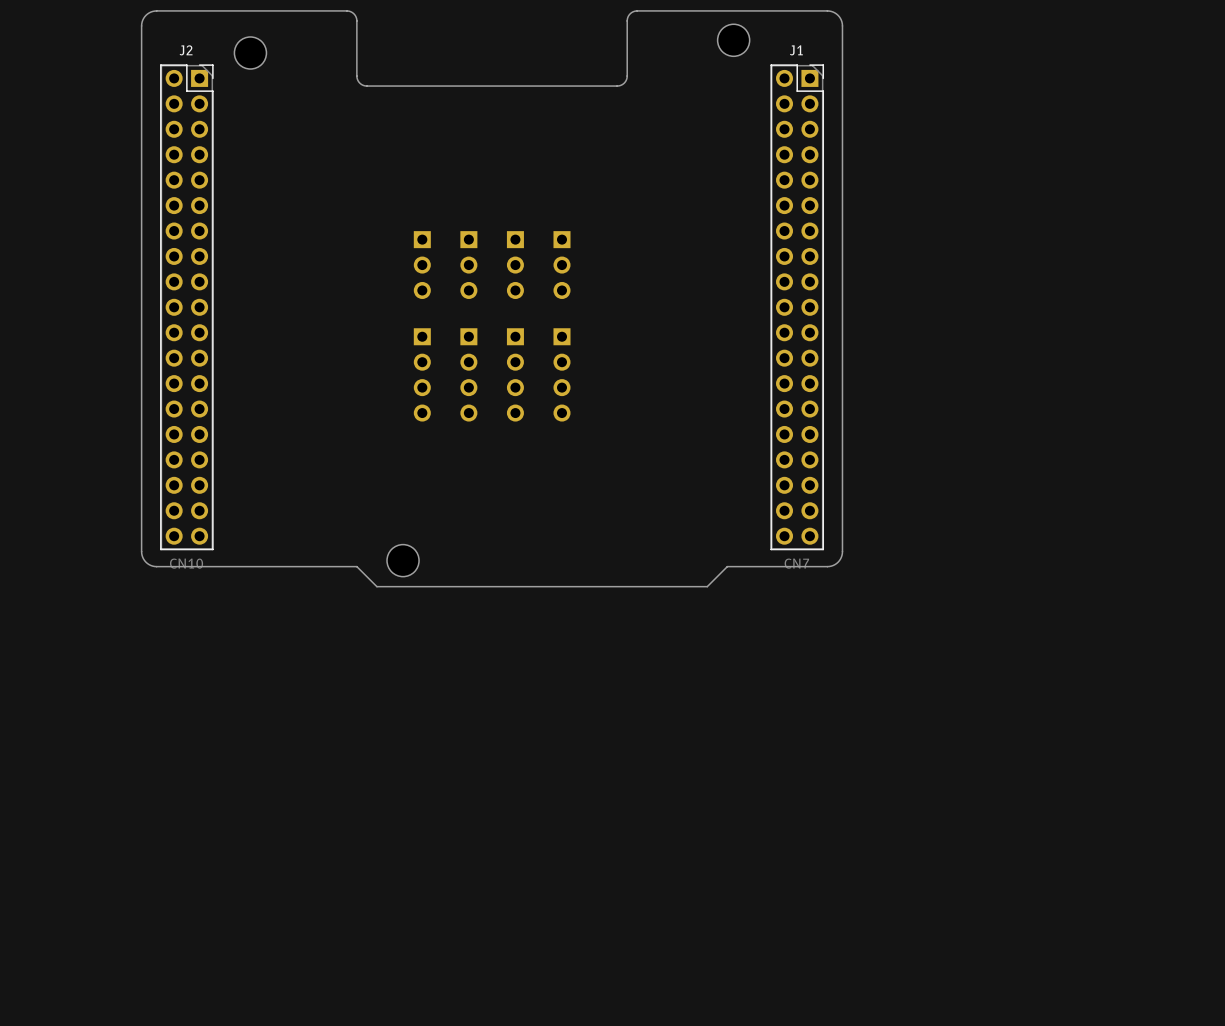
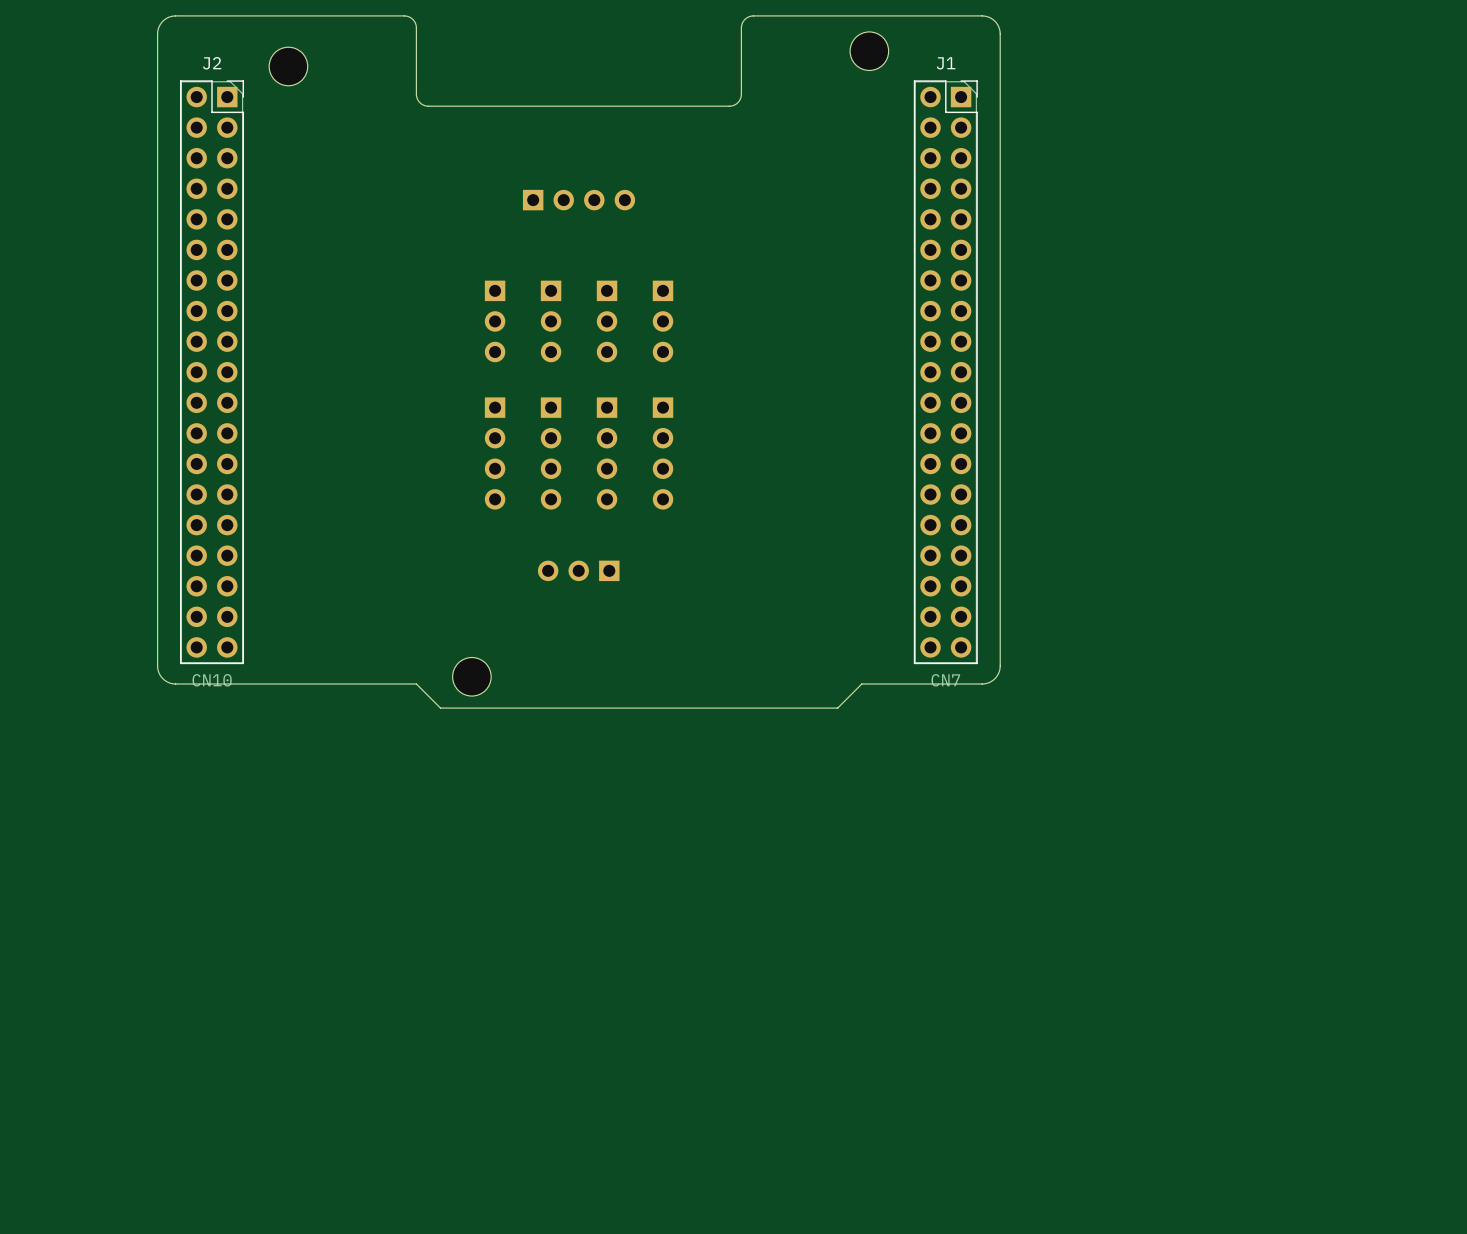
part: none -> (579, 200)
part: none -> (578, 570)

